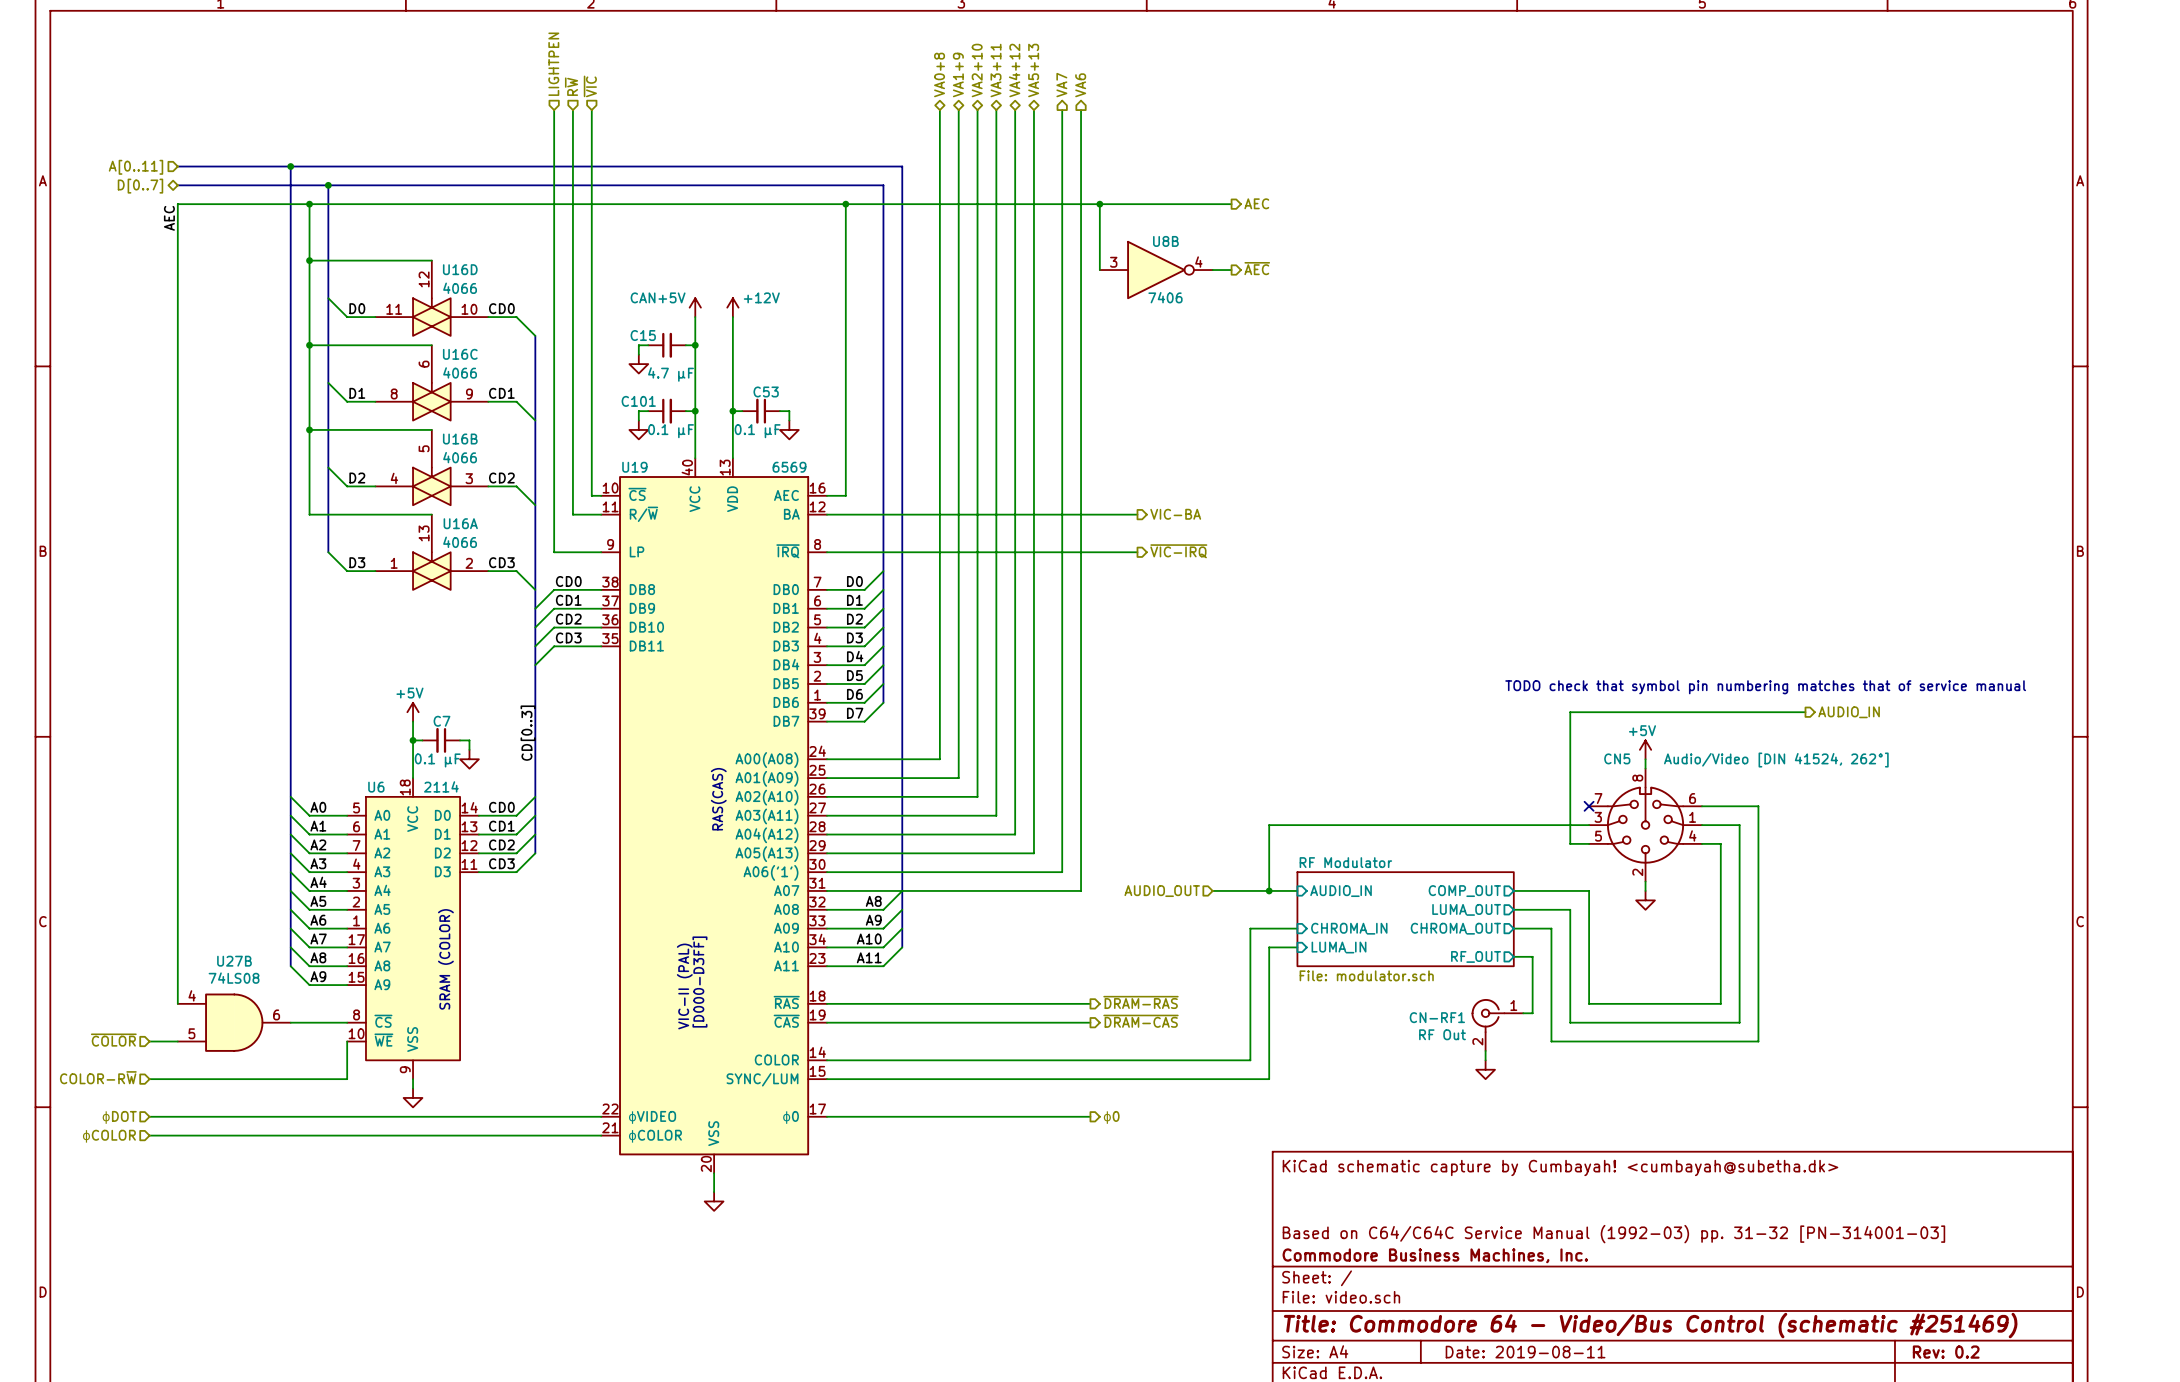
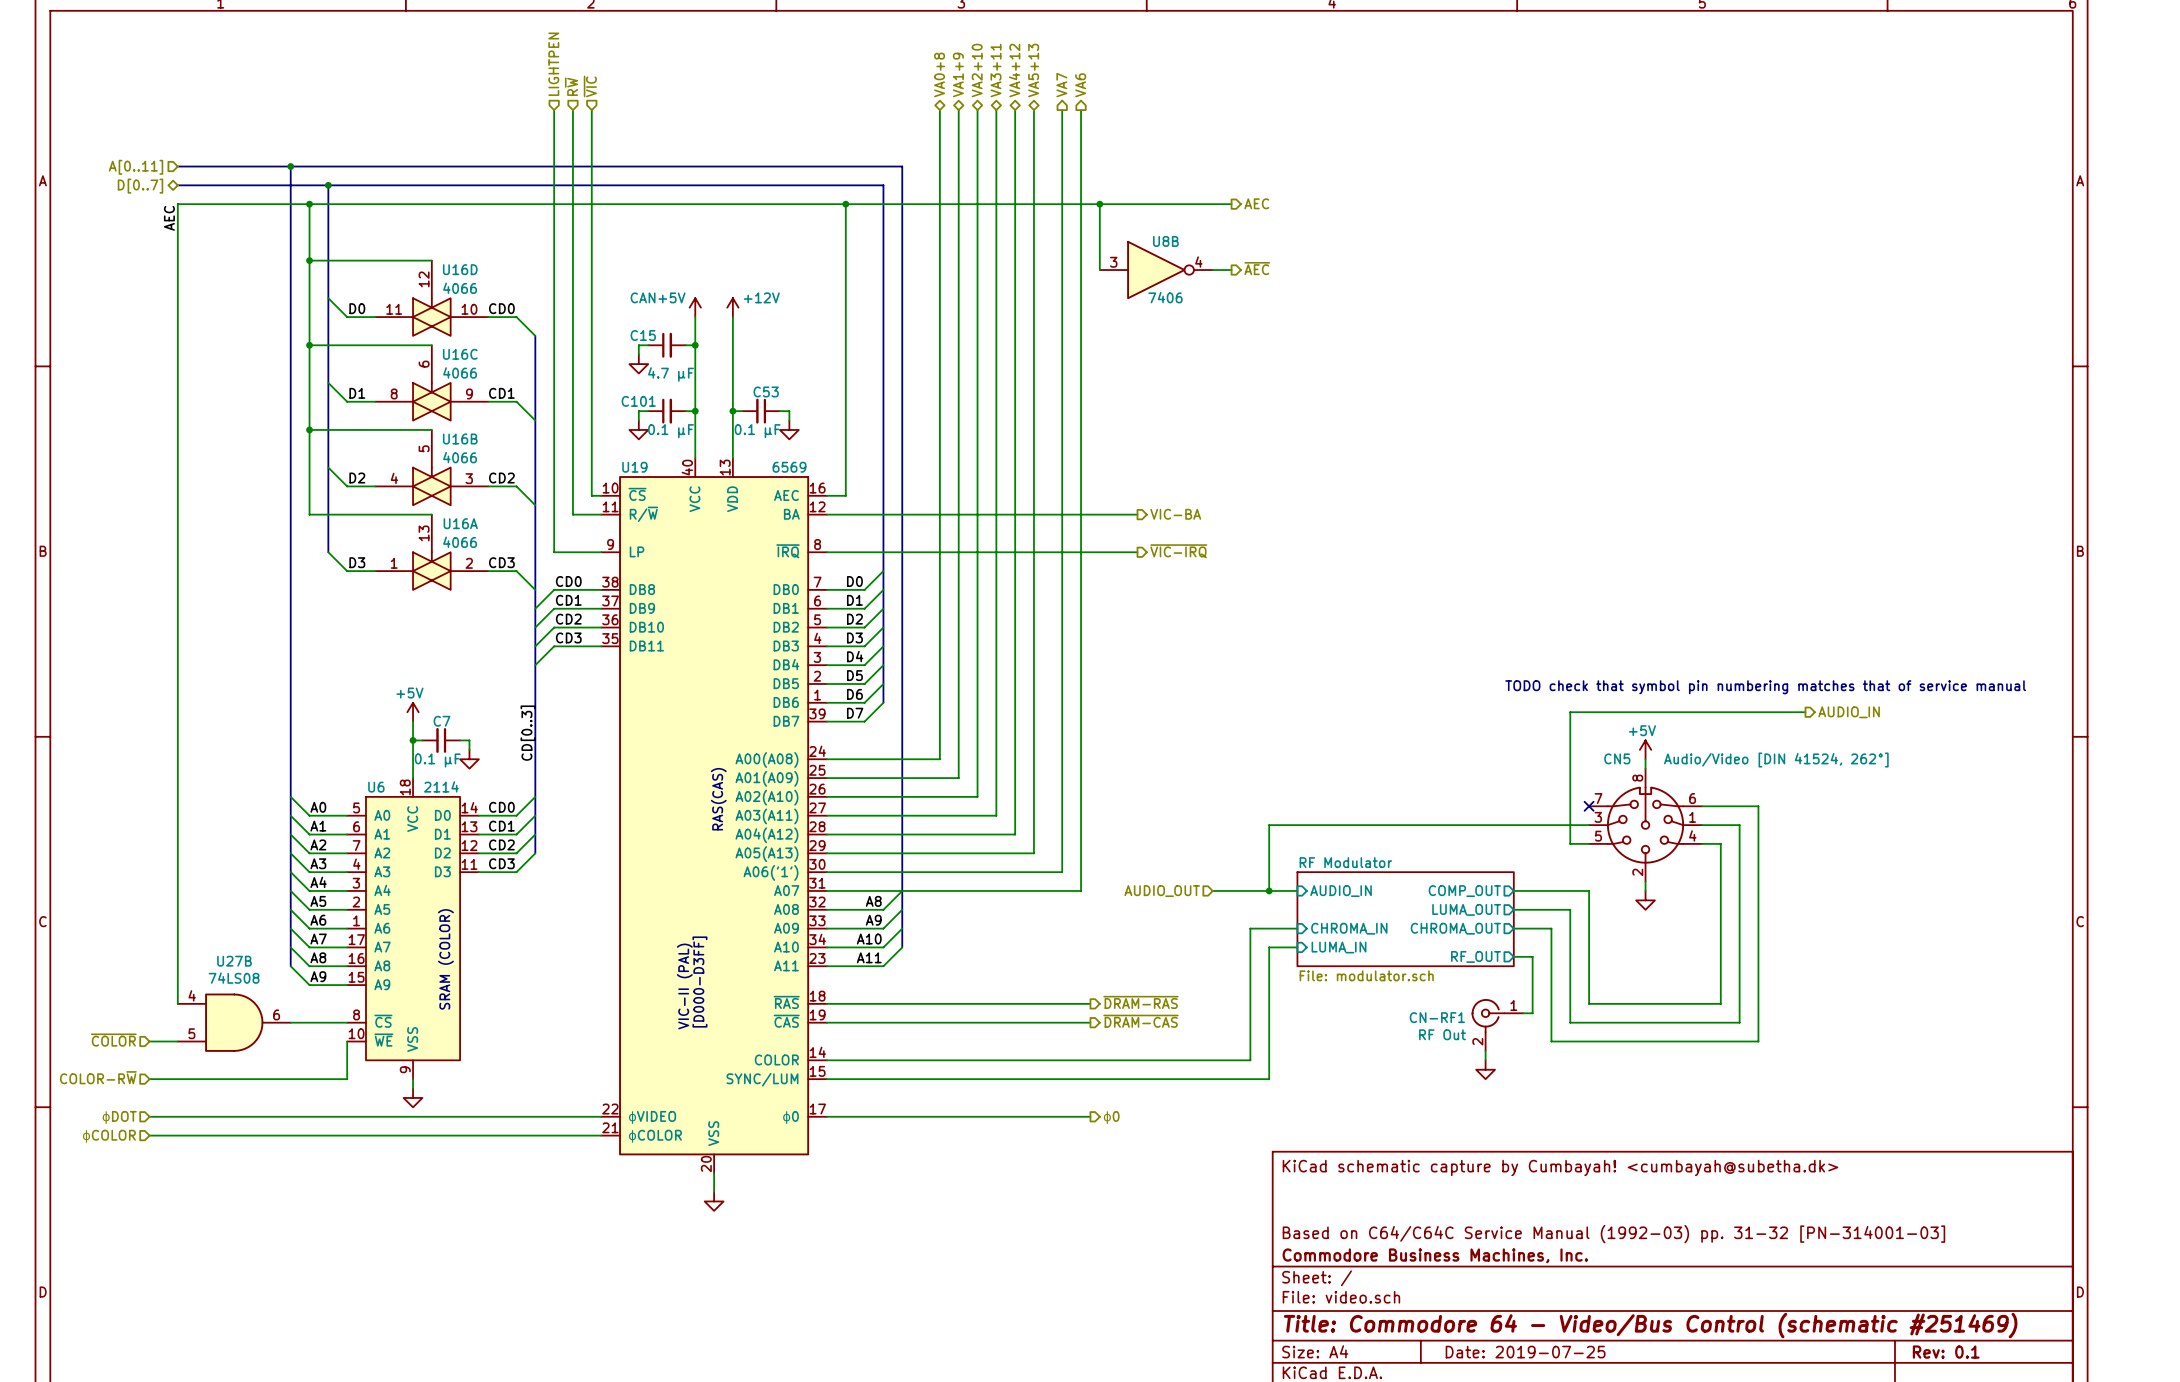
title block: Date: 2019-08-11 (1525, 1352) -> Date: 2019-07-25 (1525, 1352)
title block: Rev: 0.2 (1946, 1352) -> Rev: 0.1 (1946, 1352)

